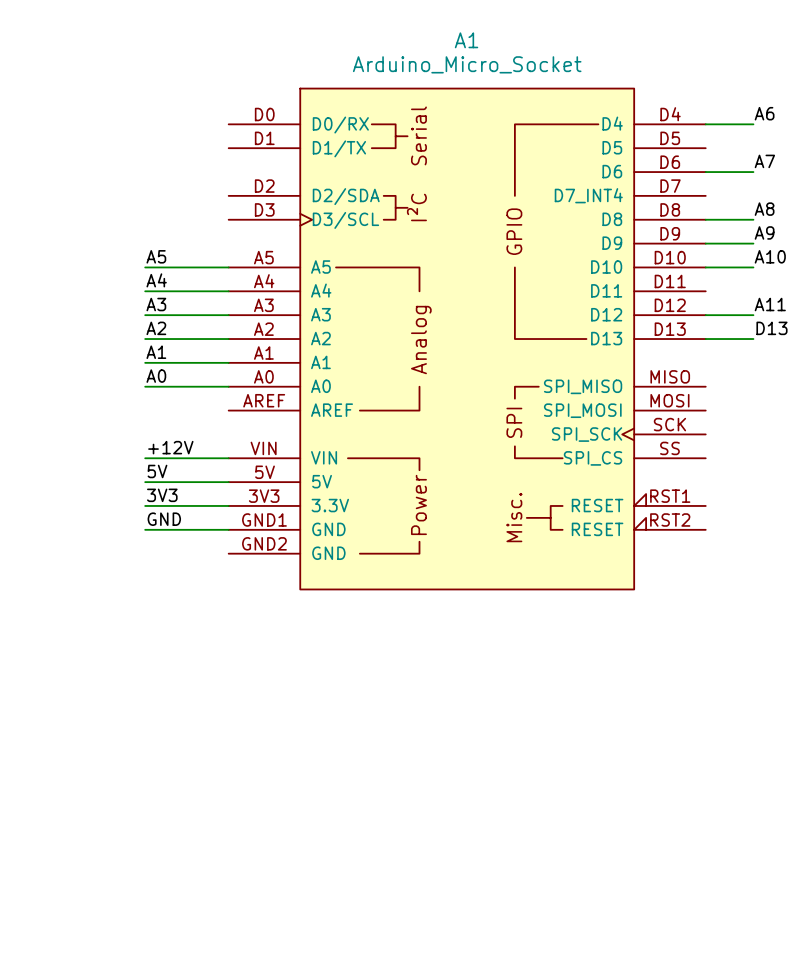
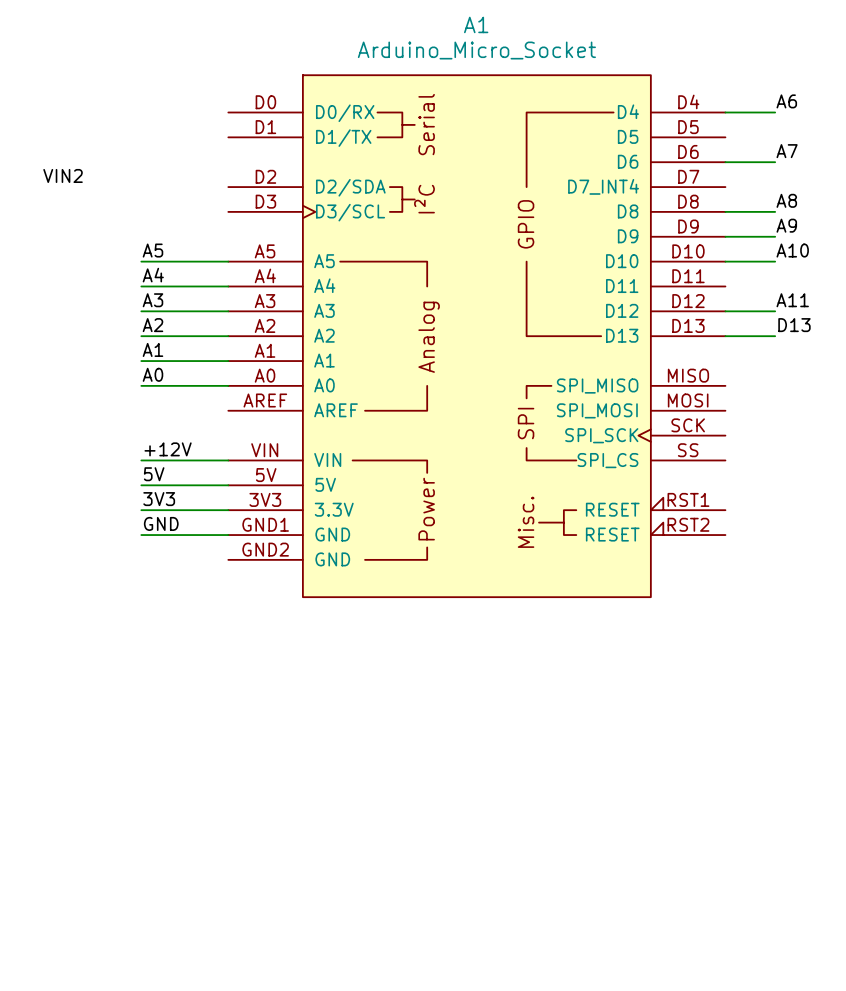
label: none -> VIN2 (63, 175)

